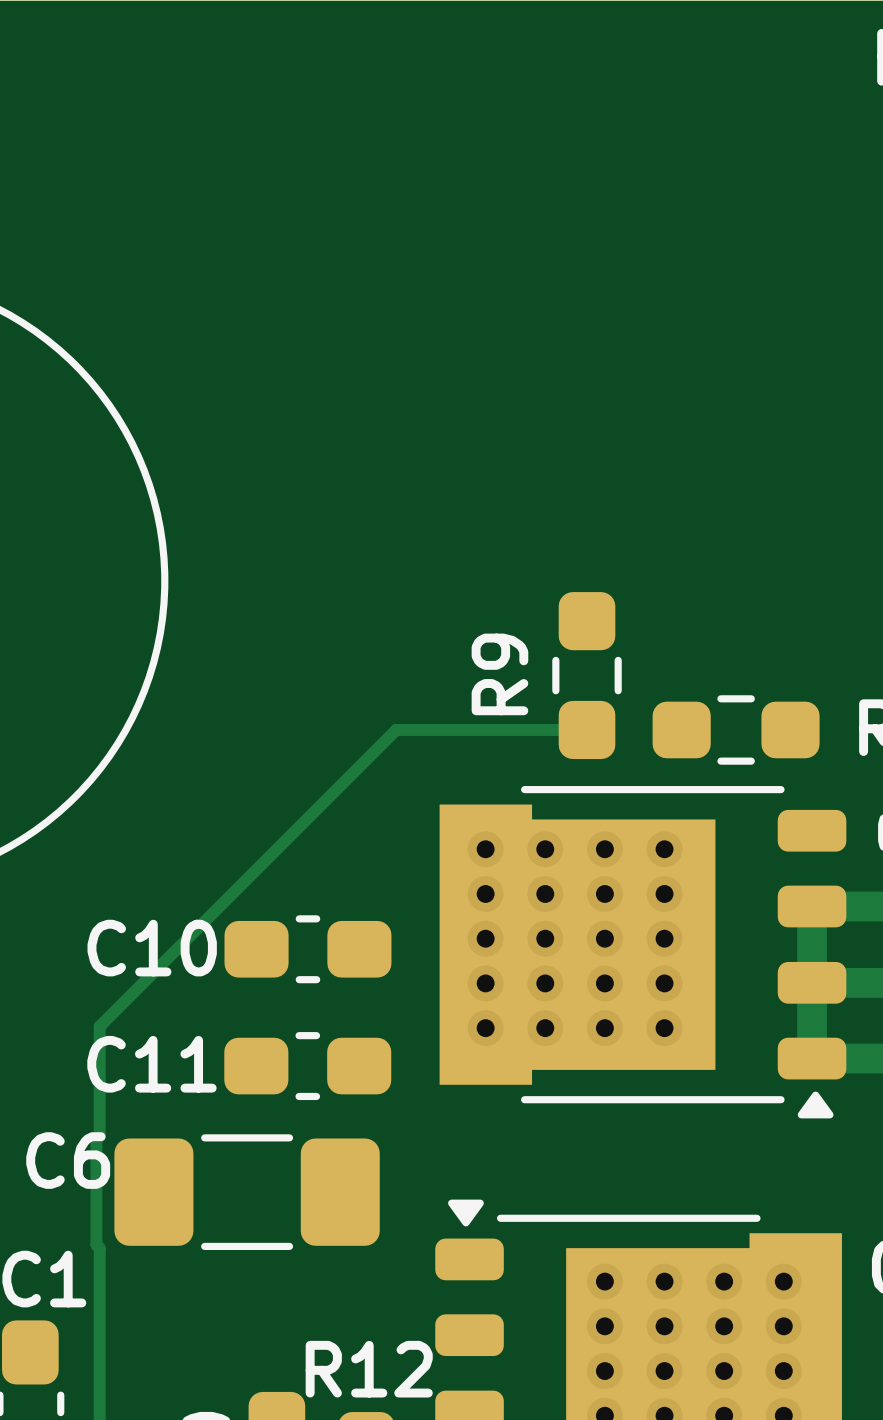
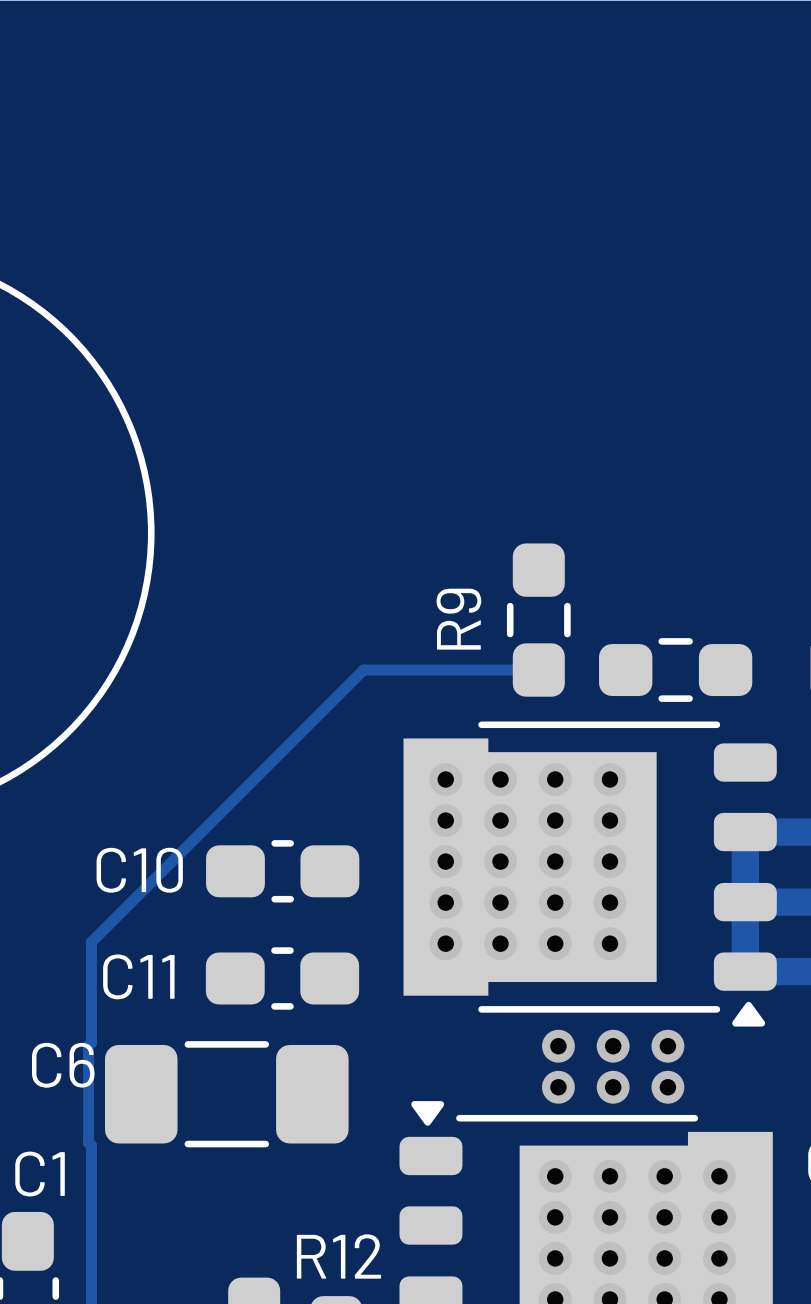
via: none -> (558, 1046)
via: none -> (613, 1046)
via: none -> (667, 1046)
via: none -> (558, 1087)
via: none -> (613, 1087)
via: none -> (667, 1087)

